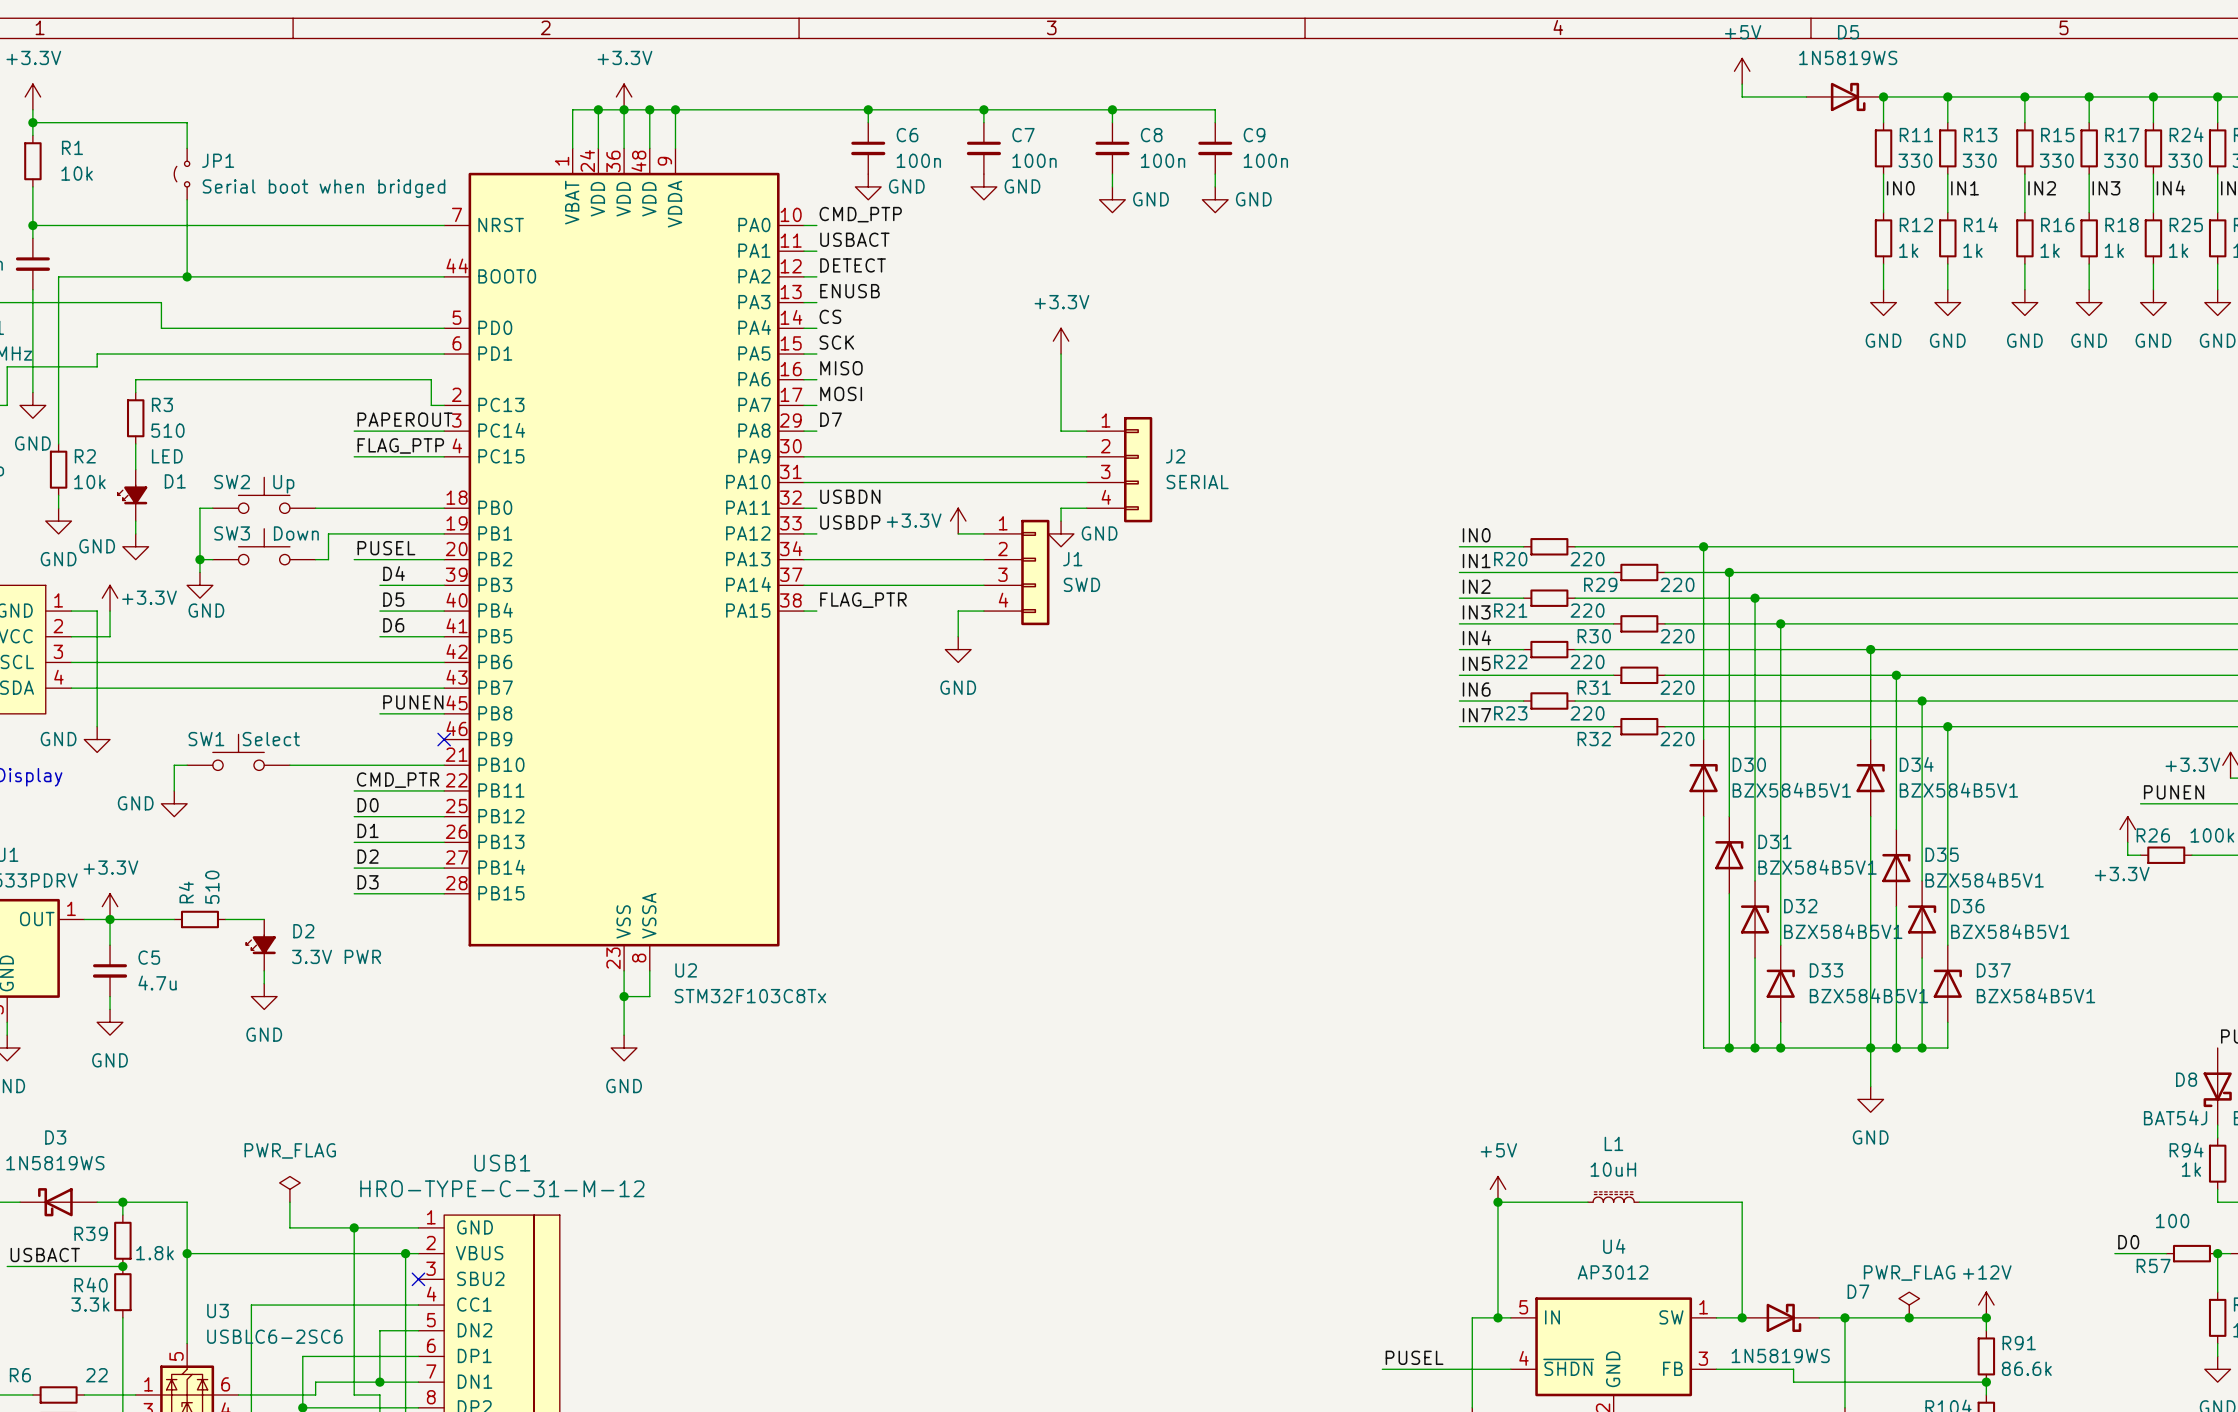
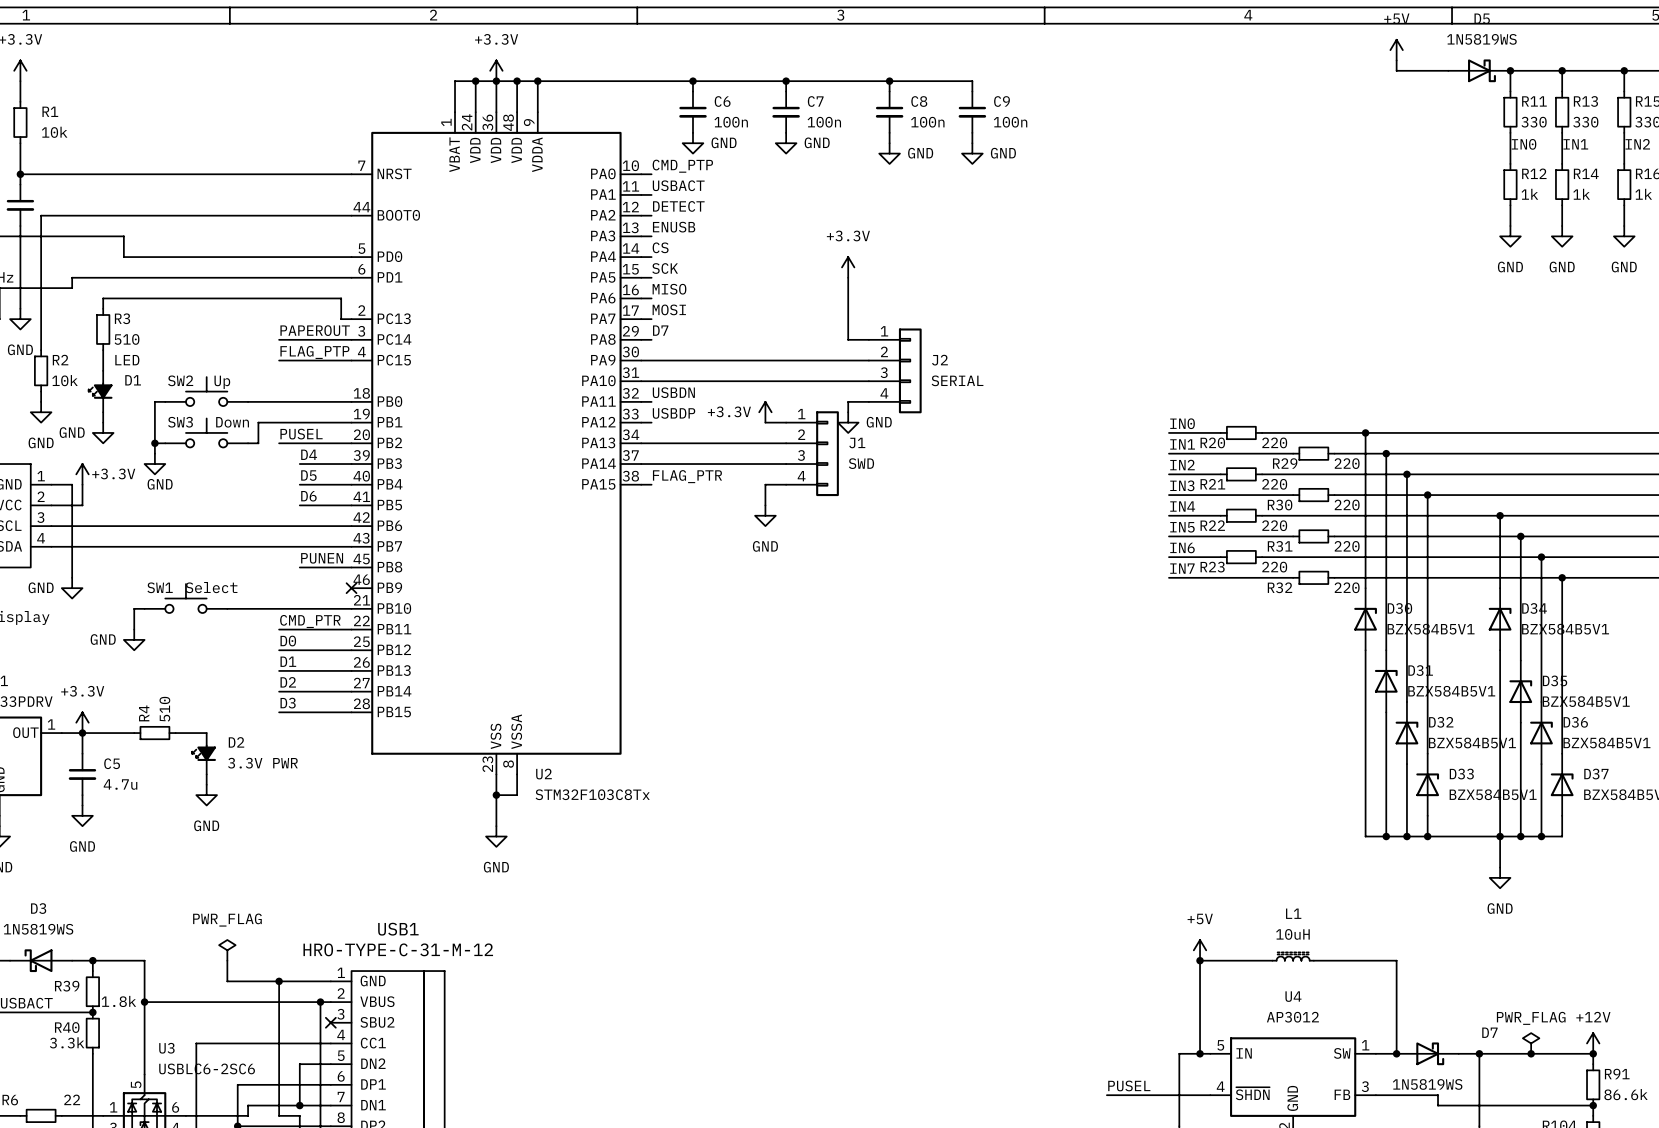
wire: (32, 122) (187, 122) (187, 148) -> none
junction: (32, 122) -> none
JP1: Serial boot when bridged (181, 174) -> none
wire: (187, 199) (187, 276) -> none
junction: (187, 276) -> none

